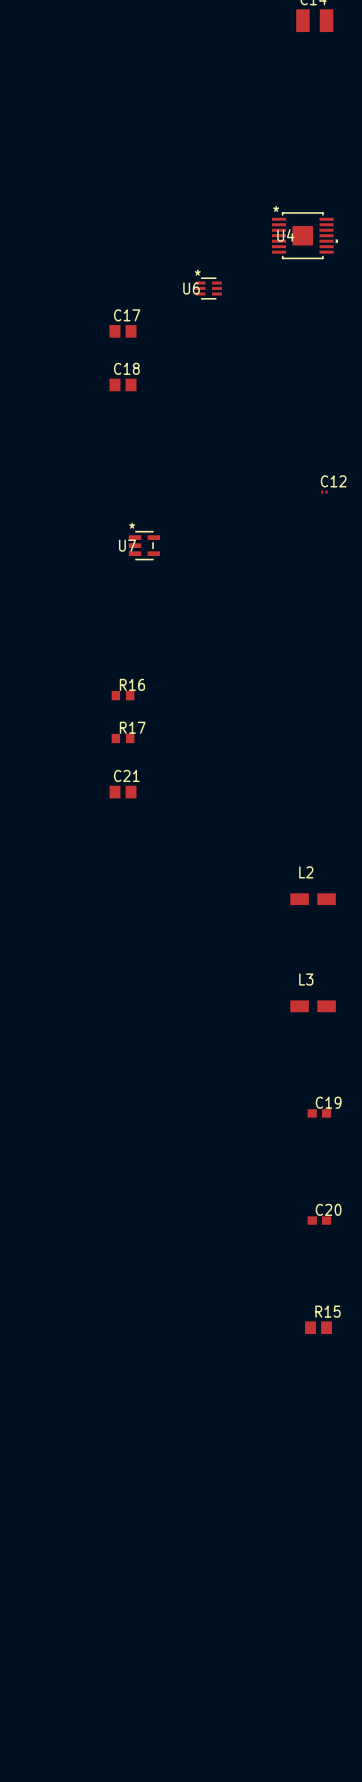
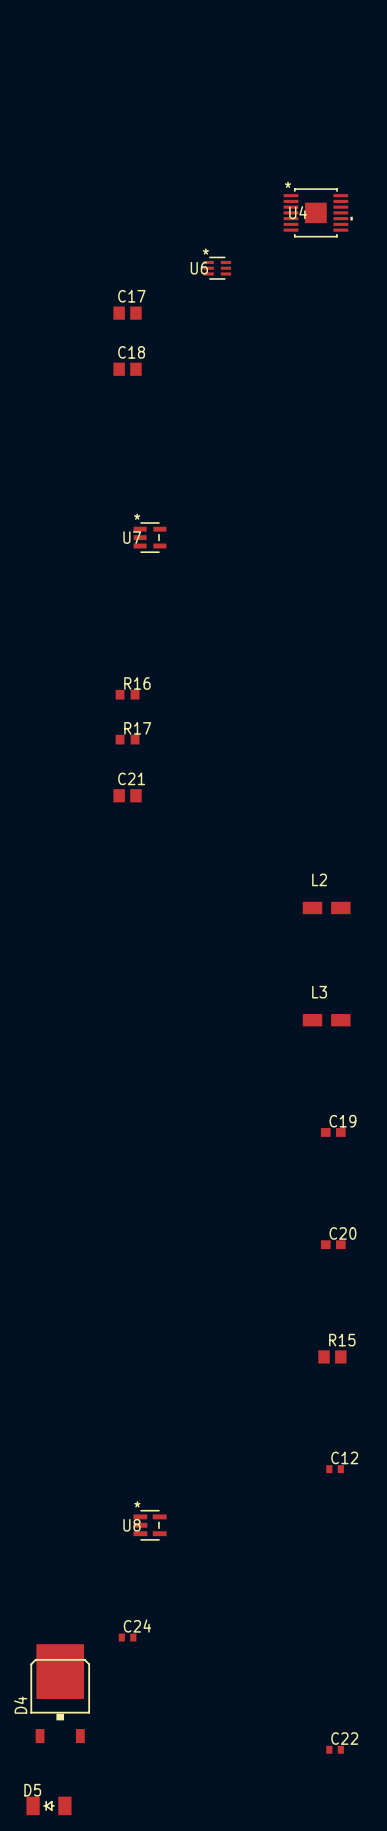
C12 footprint: [321, 490, 328, 494] -> [326, 1465, 344, 1474]
U8: none -> (150, 1525)
C24: none -> (127, 1637)
D4: none -> (60, 1693)
C22: none -> (335, 1749)
D5: none -> (48, 1805)

